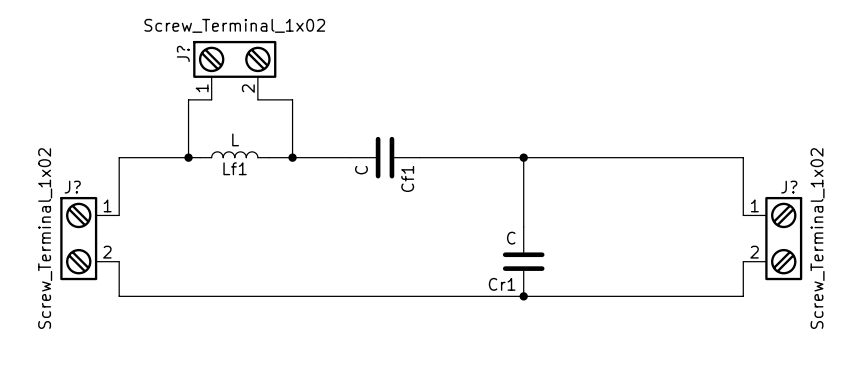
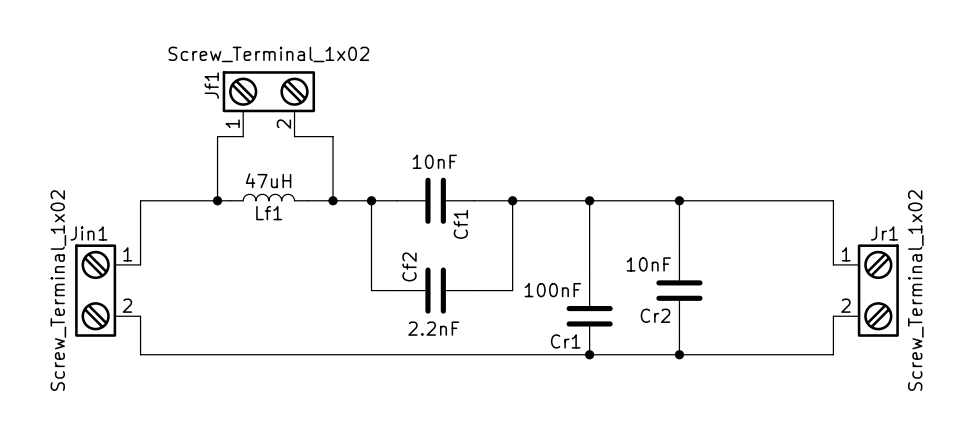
J? name: J? (183, 53) -> Jf1 (211, 85)
Lf1 value: L (235, 139) -> 47uH (268, 180)
wire: none -> (371, 200) (371, 290) (397, 290)
junction: none -> (371, 200)
wire: none -> (512, 200) (512, 290) (474, 290)
junction: none -> (512, 200)
wire: none -> (679, 200) (679, 252)
junction: none -> (679, 200)
Cf1 value: C (361, 170) -> 10nF (434, 161)
J? name: J? (72, 187) -> Jin1 (88, 233)
J? name: J? (789, 187) -> Jr1 (884, 233)
Cf2: none -> 2.2nF (435, 290)
Cr1 value: C (511, 238) -> 100nF (552, 290)
Cr2: none -> 10nF (679, 290)
wire: none -> (679, 329) (679, 354)
junction: none -> (679, 354)

